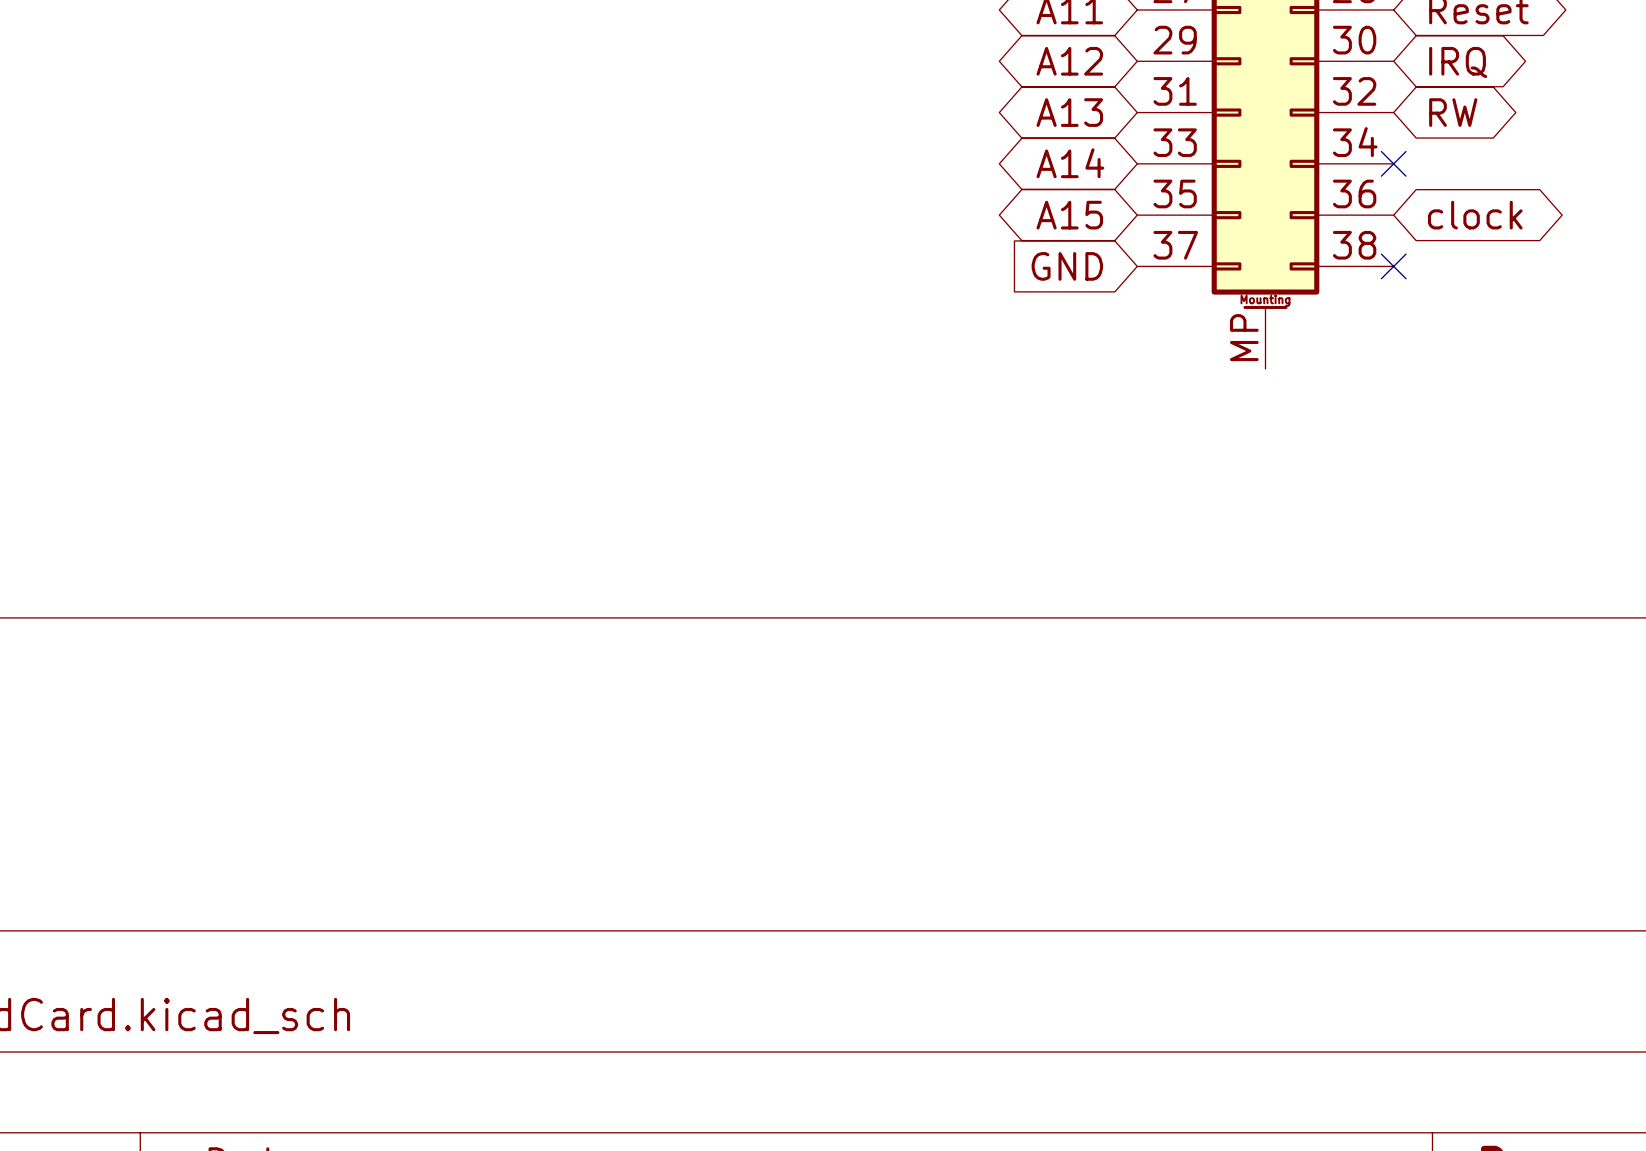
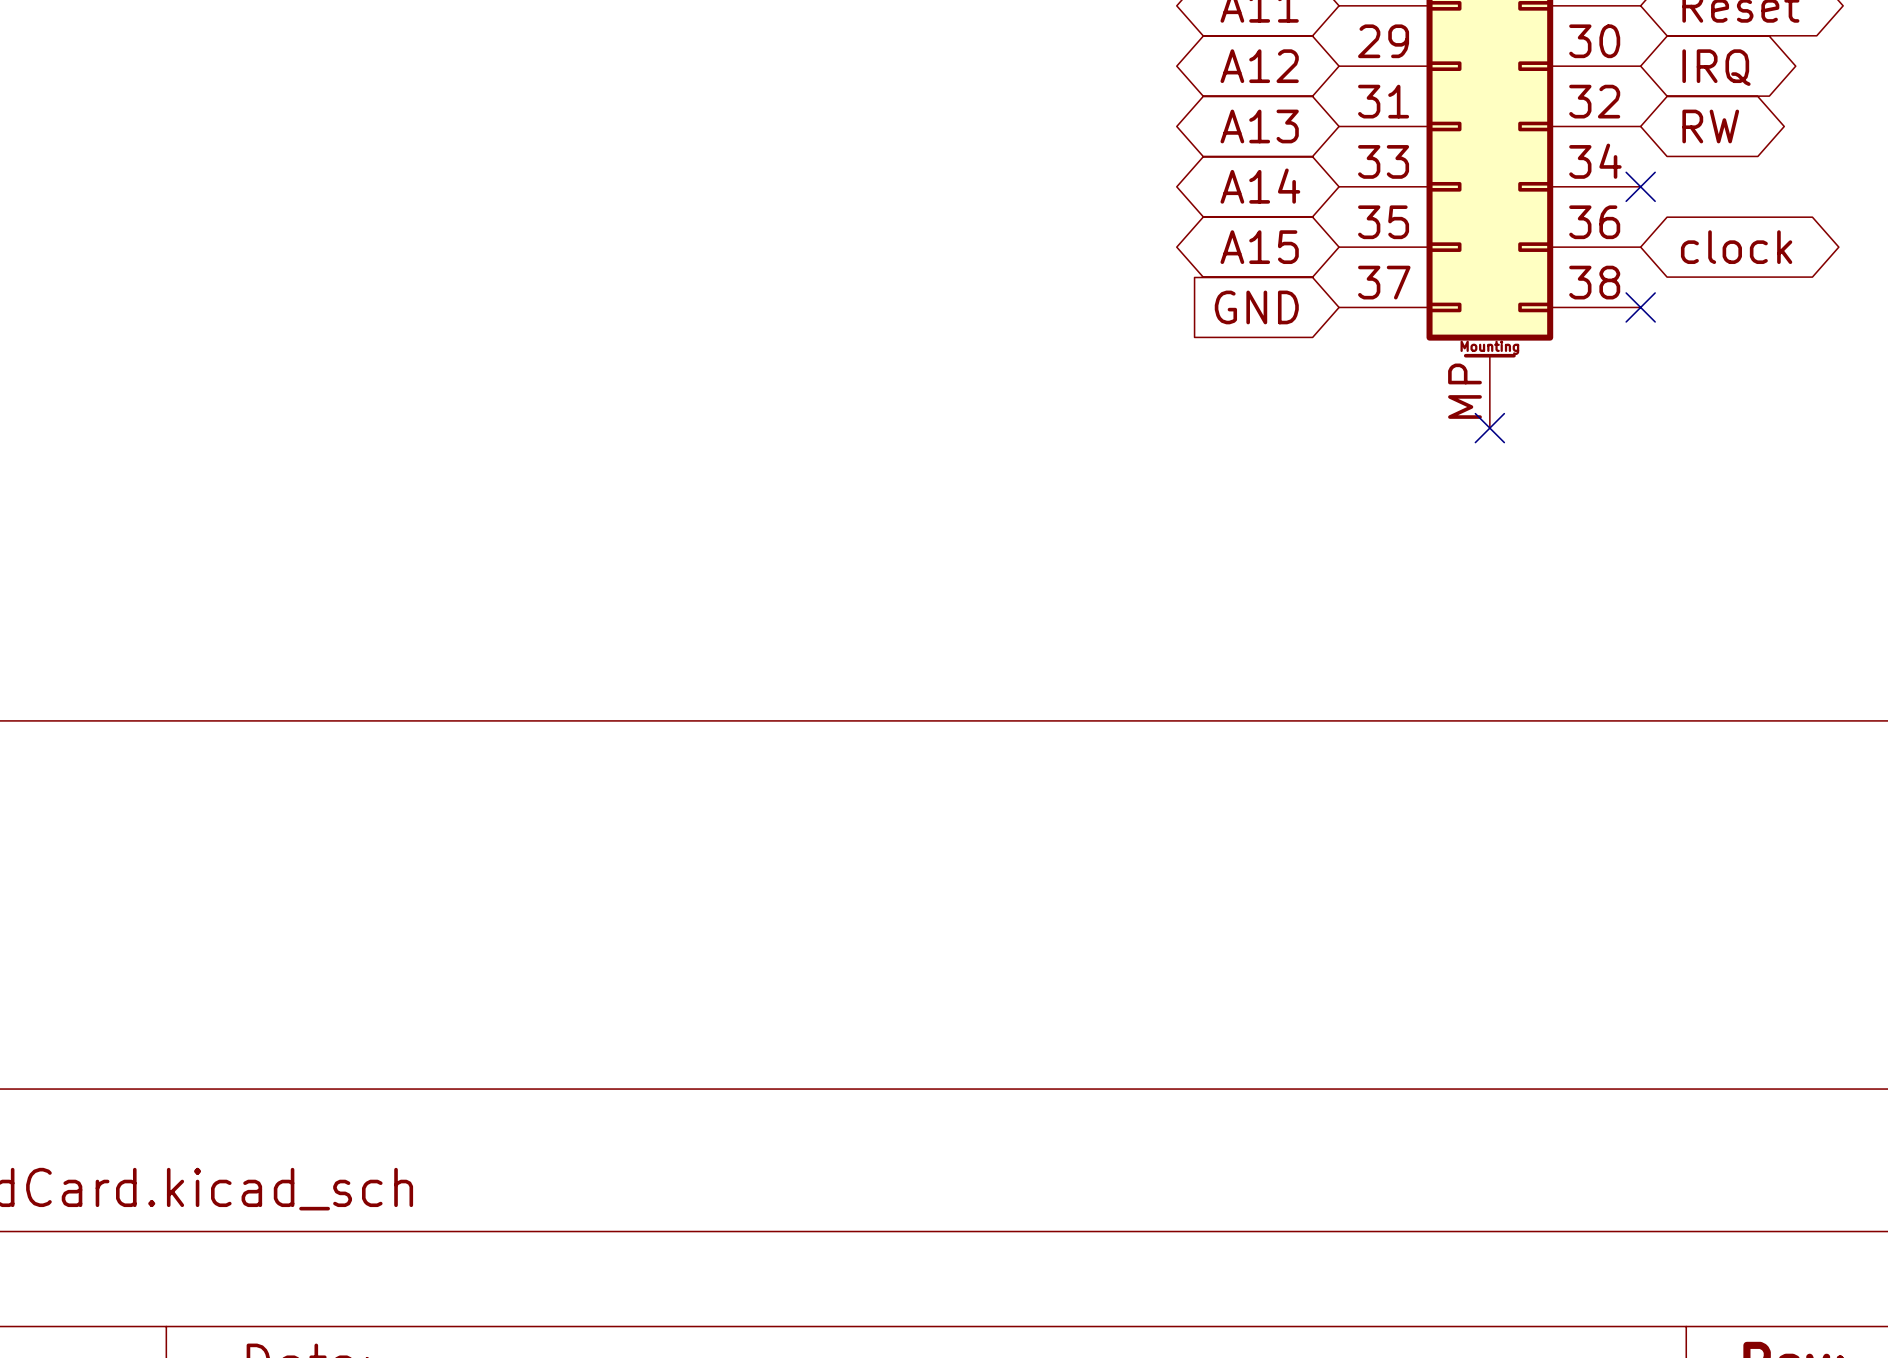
no-connect mark: none -> (1489, 428)

